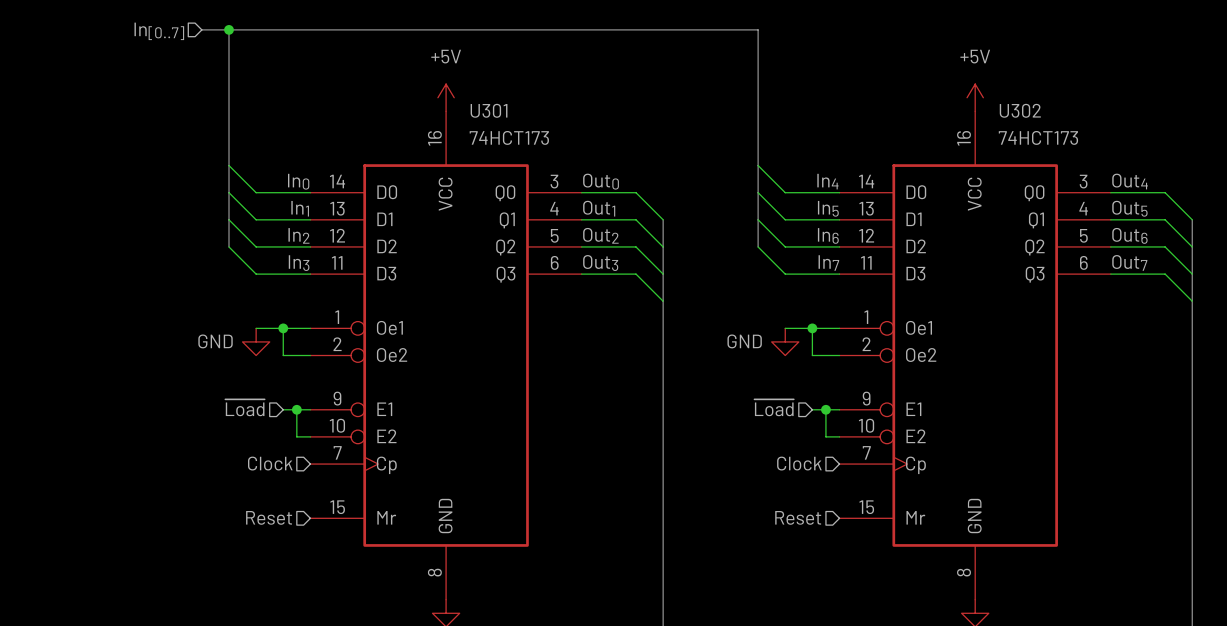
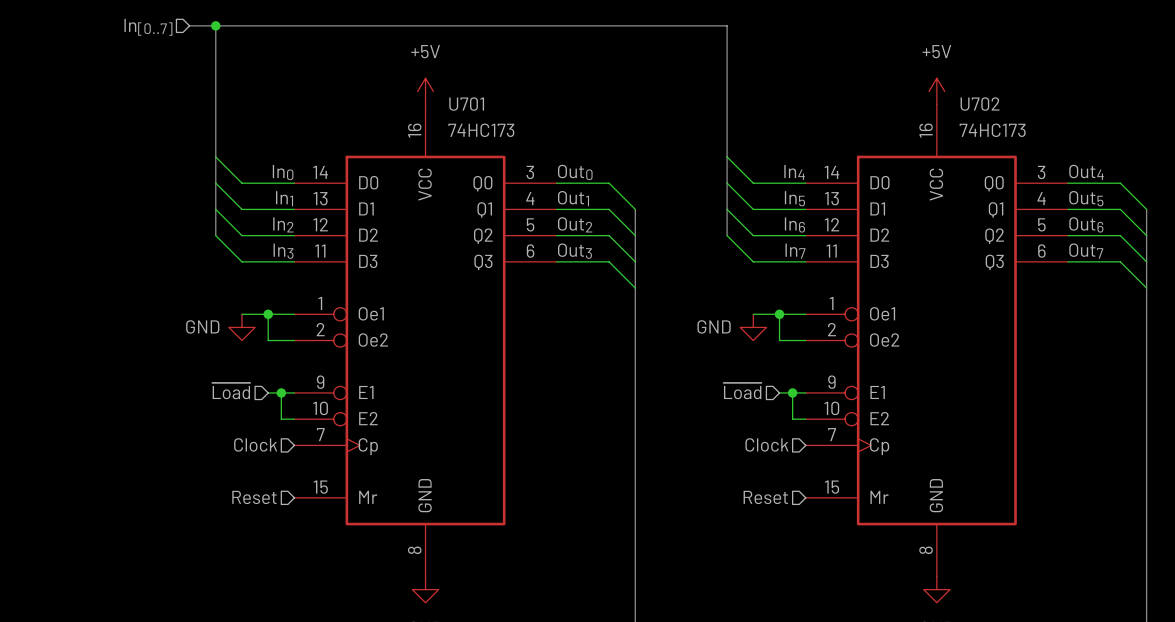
U301 name: U301 (489, 110) -> U701 (466, 104)
U302 name: U302 (1020, 110) -> U702 (980, 104)
U301 value: 74HCT173 (509, 137) -> 74HC173 (481, 130)
U302 value: 74HCT173 (1038, 137) -> 74HC173 (992, 130)

